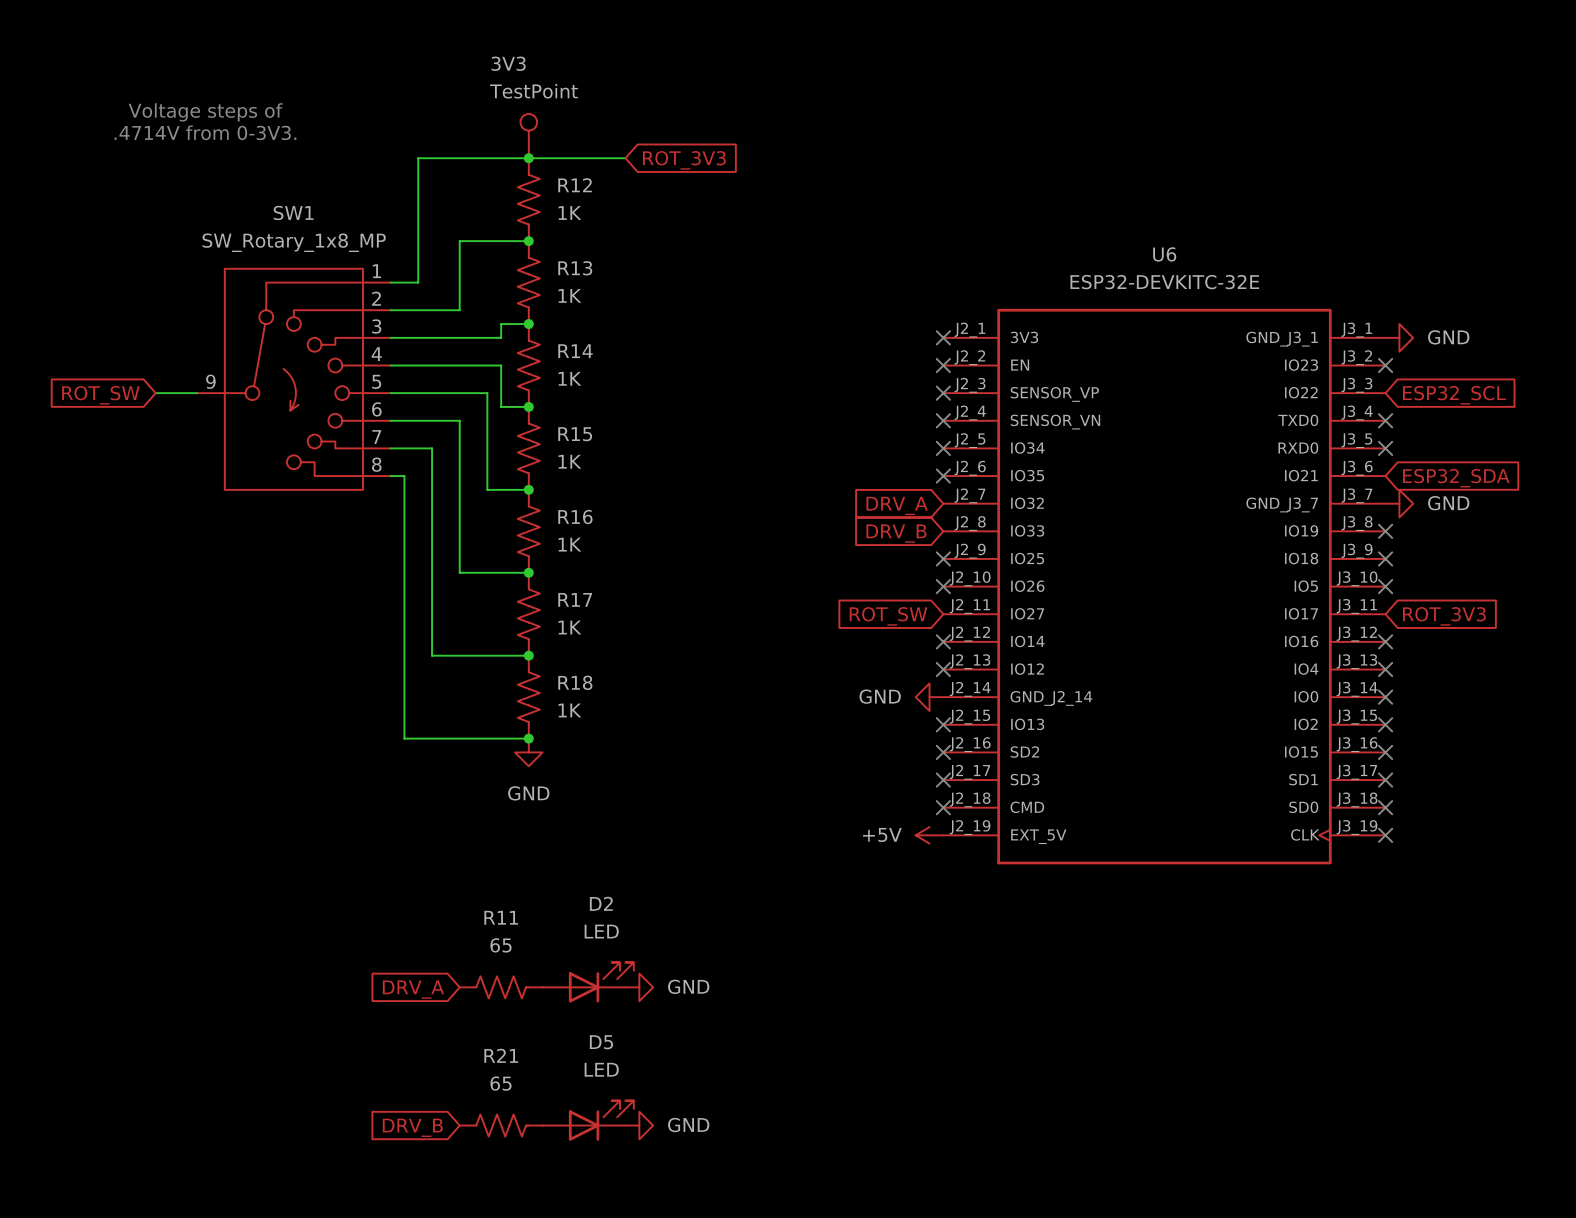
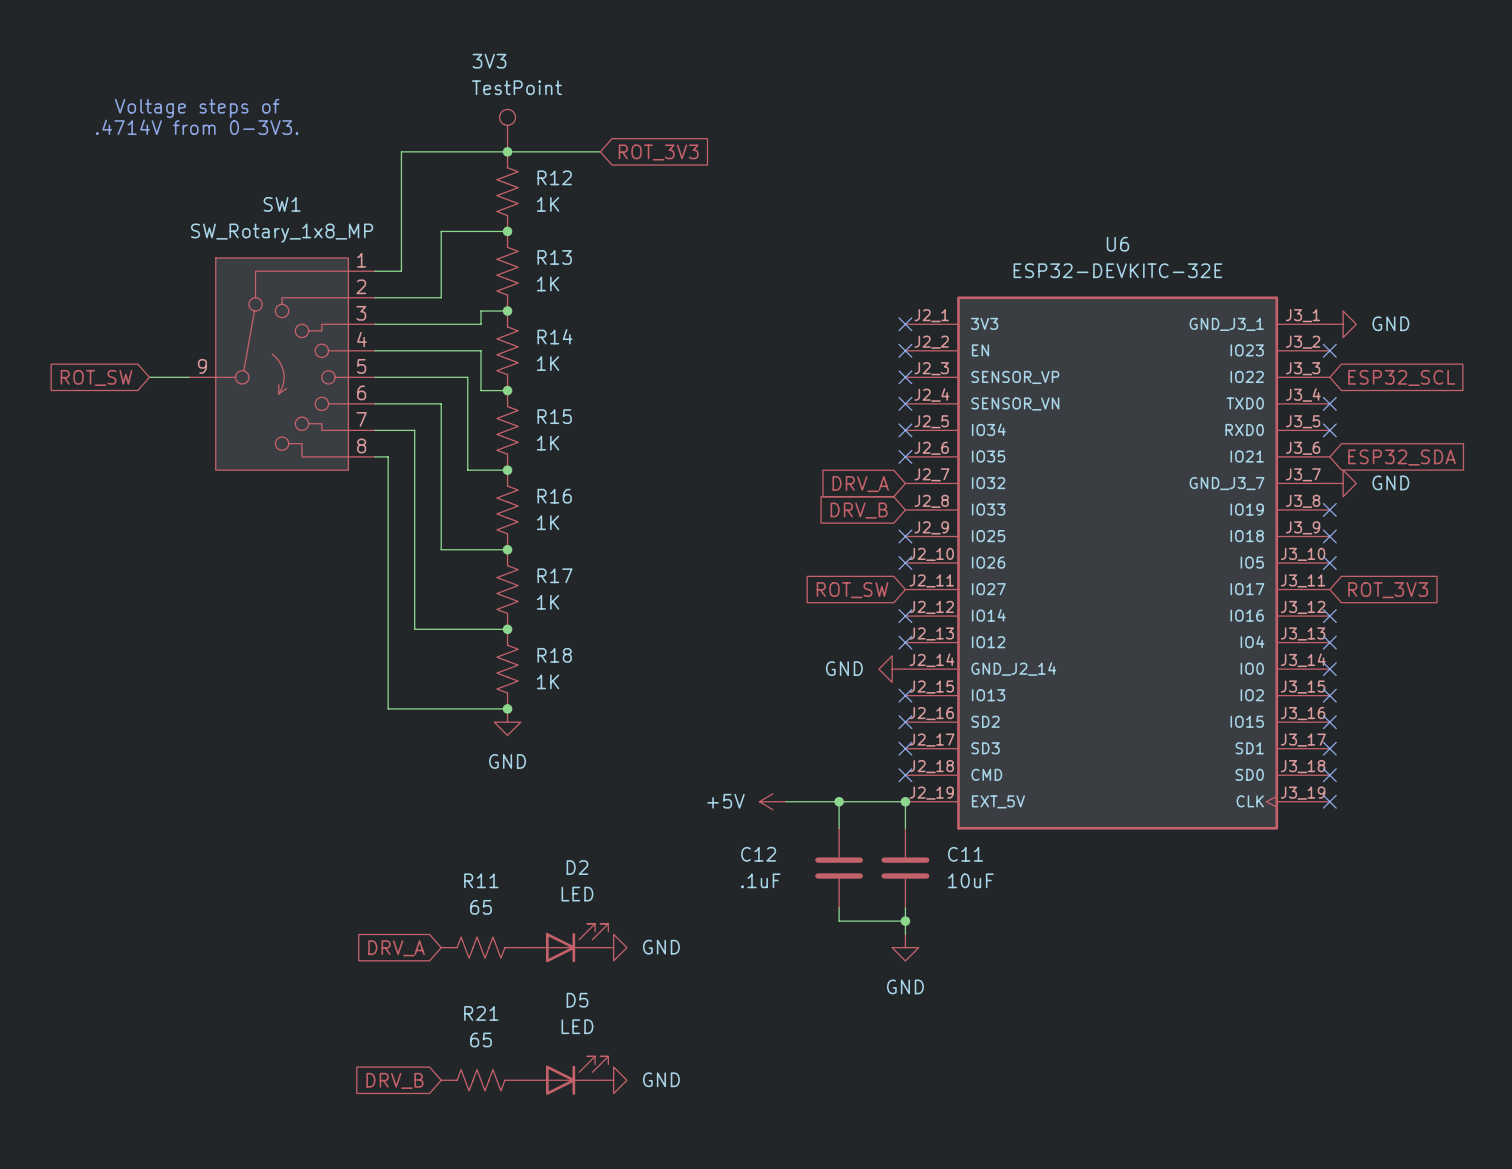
wire: none -> (786, 801) (905, 801) (905, 828)
wire: none -> (839, 801) (839, 828)
junction: none -> (839, 801)
power symbol position: +5V (929, 835) -> +5V (772, 801)
junction: none -> (905, 801)
C12: none -> .1uF (839, 868)
C11: none -> 10uF (905, 868)
wire: none -> (839, 907) (839, 921) (905, 921)
wire: none -> (905, 907) (905, 934)
junction: none -> (905, 921)
power symbol: none -> GND (905, 947)

